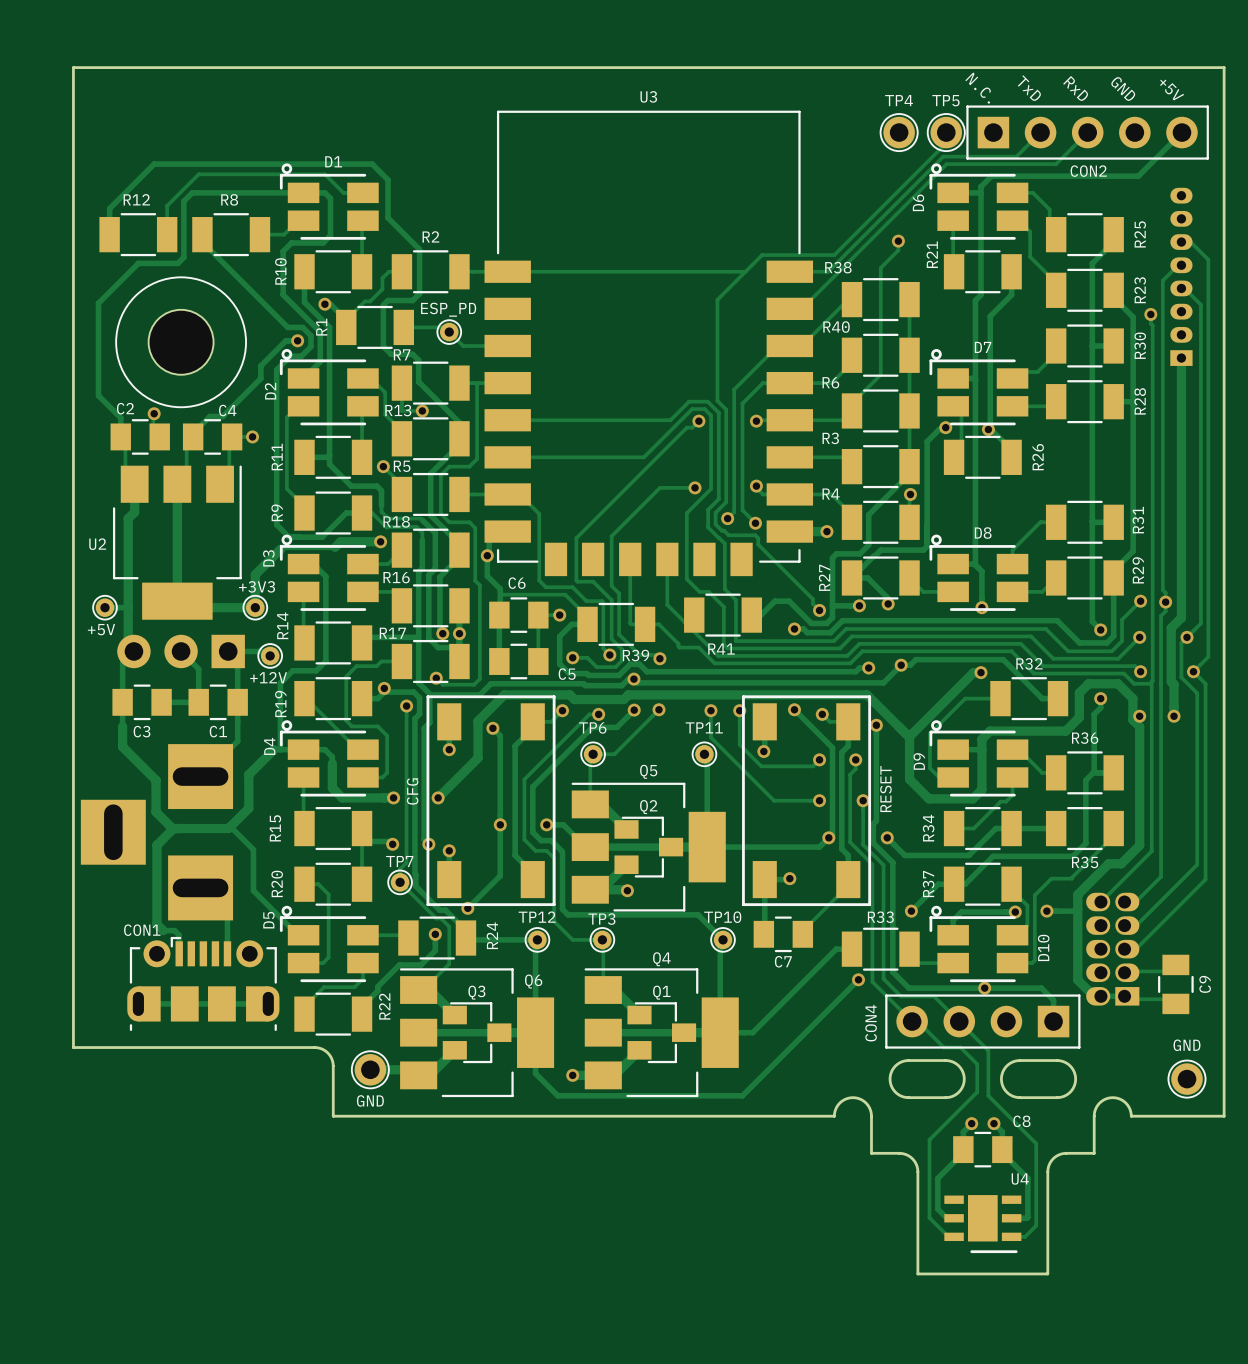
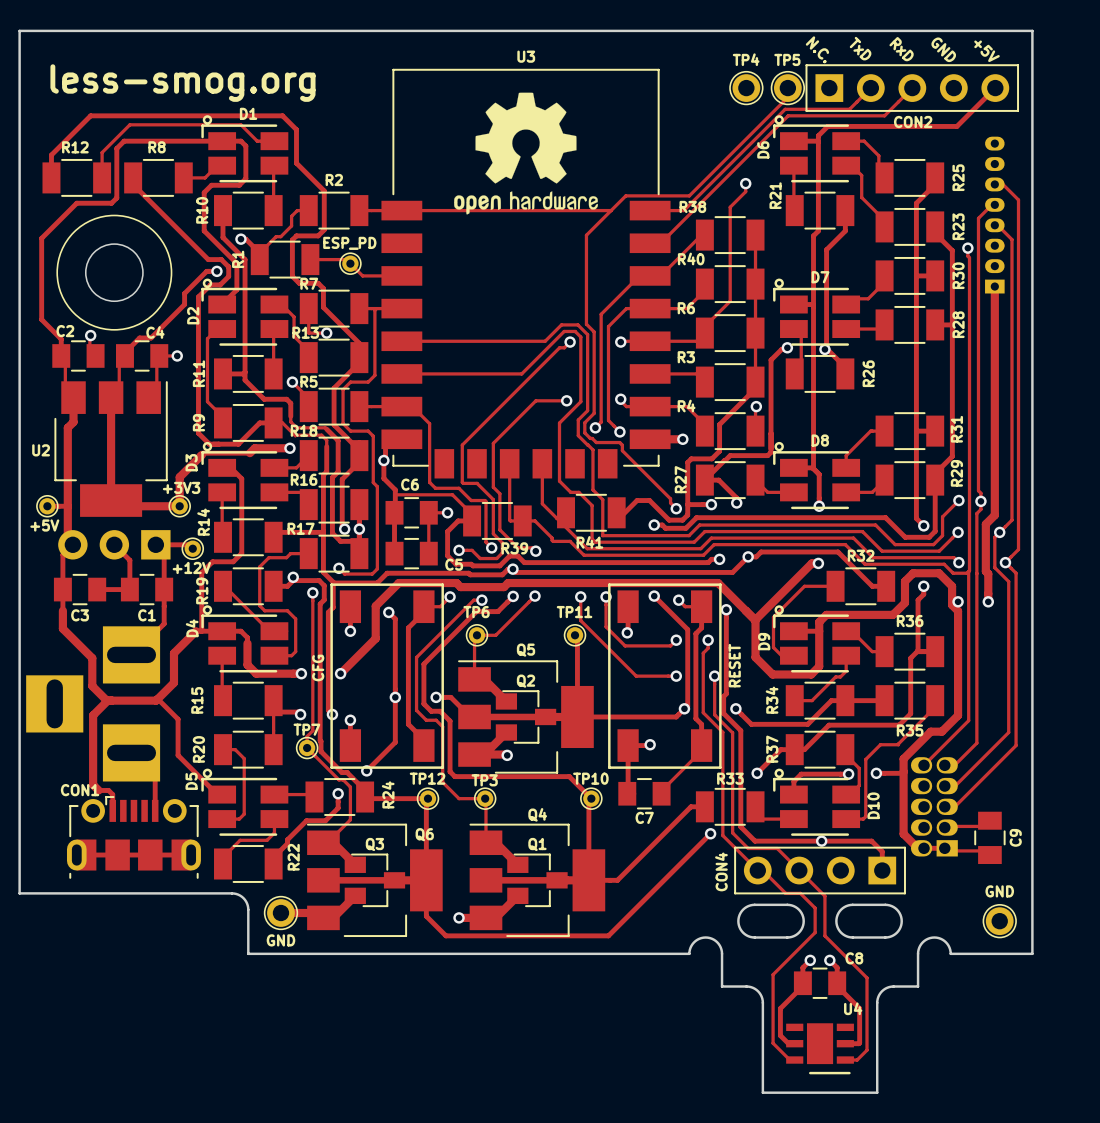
text: none -> less-smog.org (182, 83)
drawing: none -> [454, 92, 598, 215]

